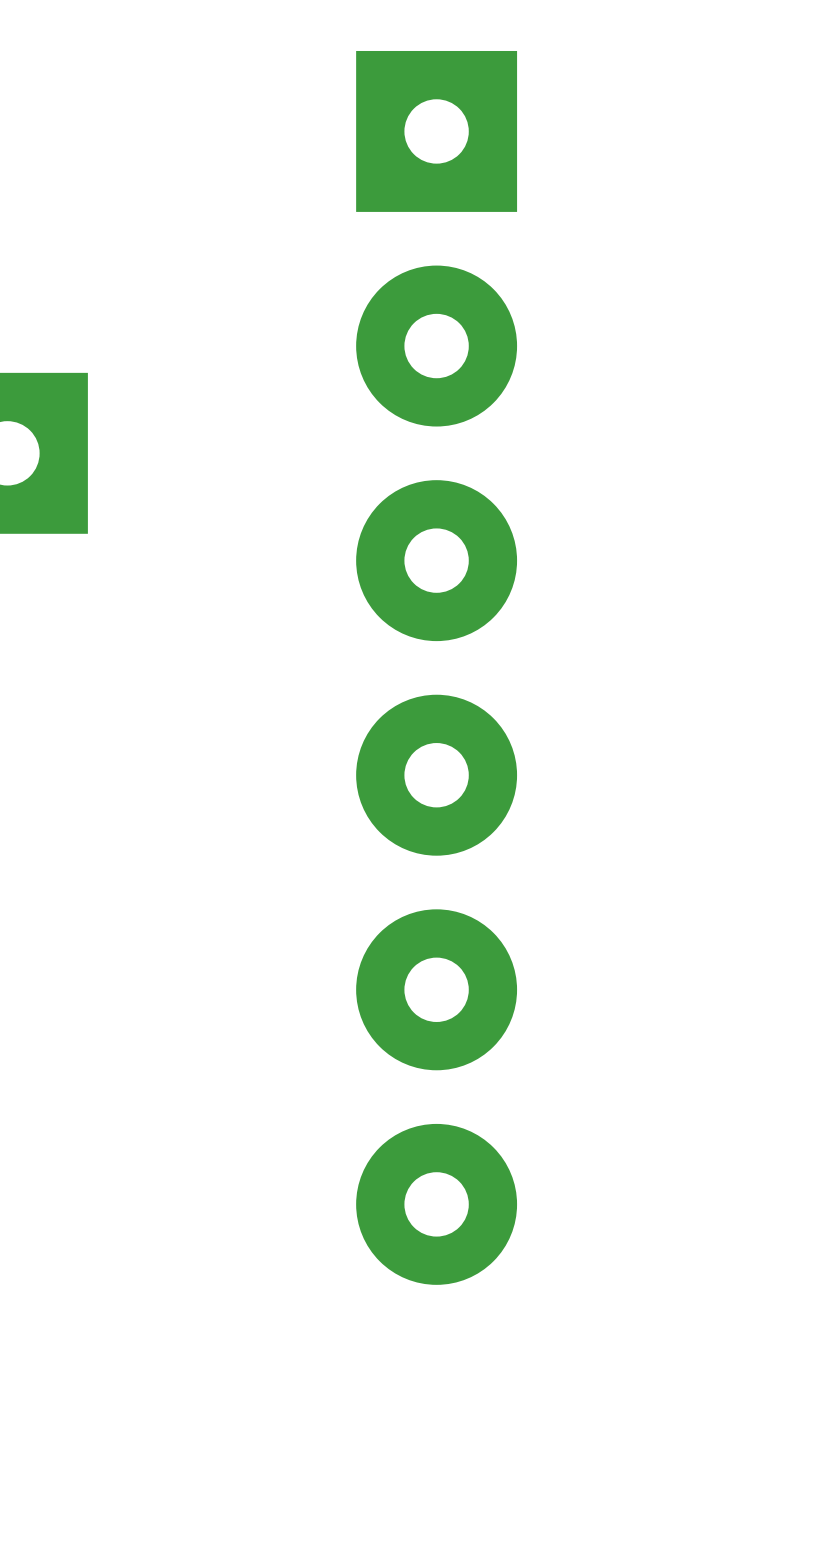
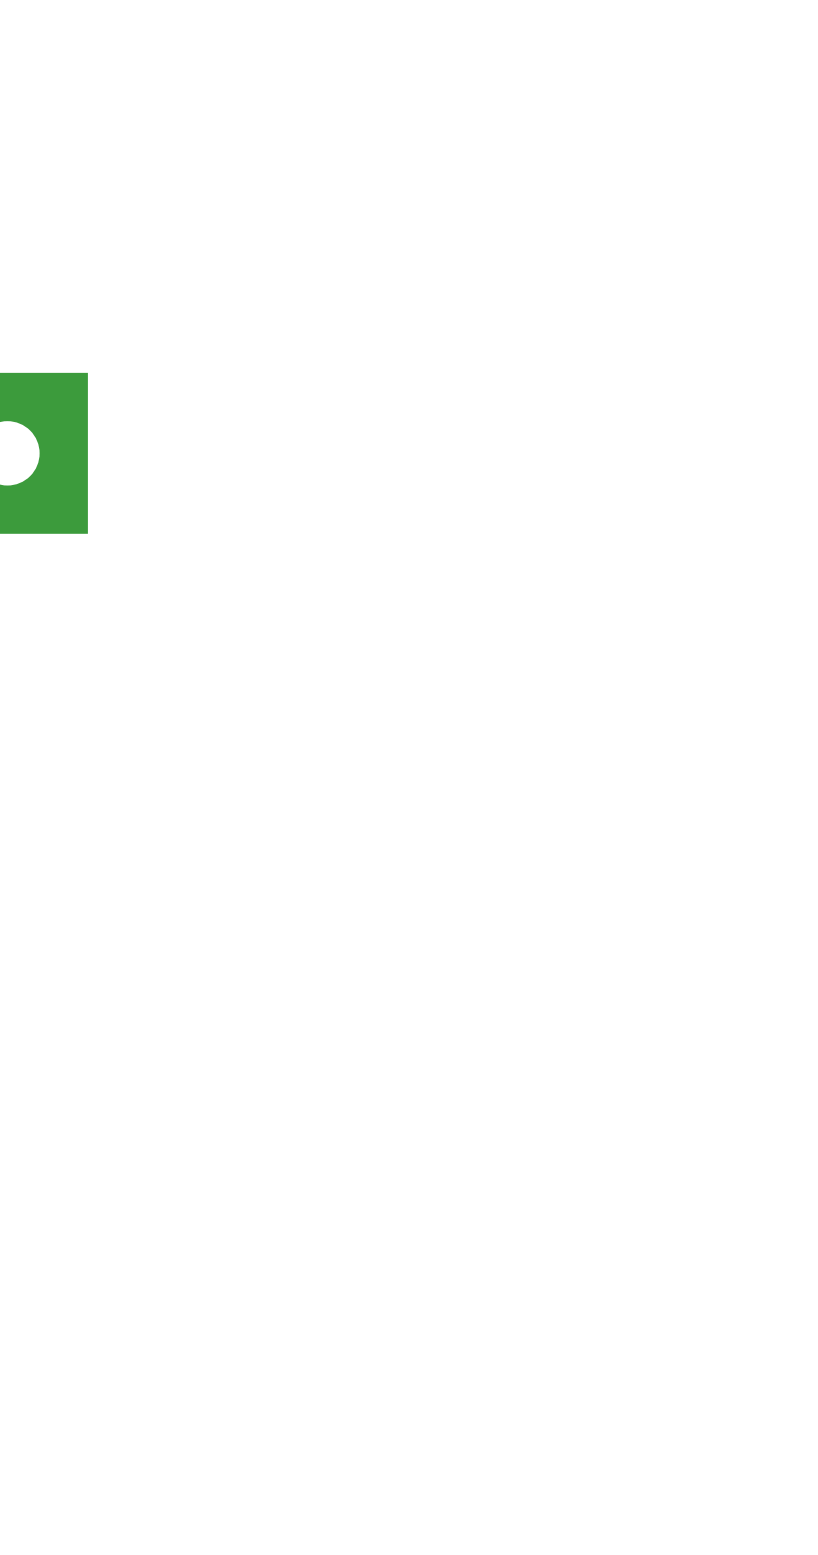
part: (436, 667) -> none

